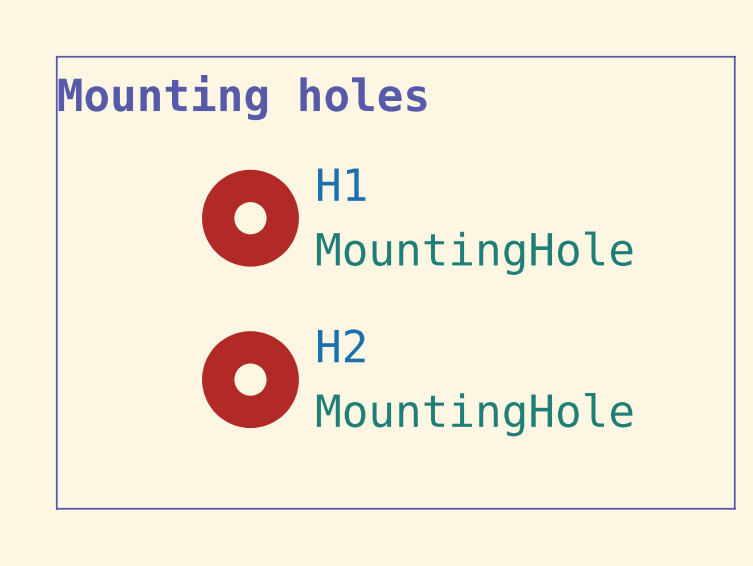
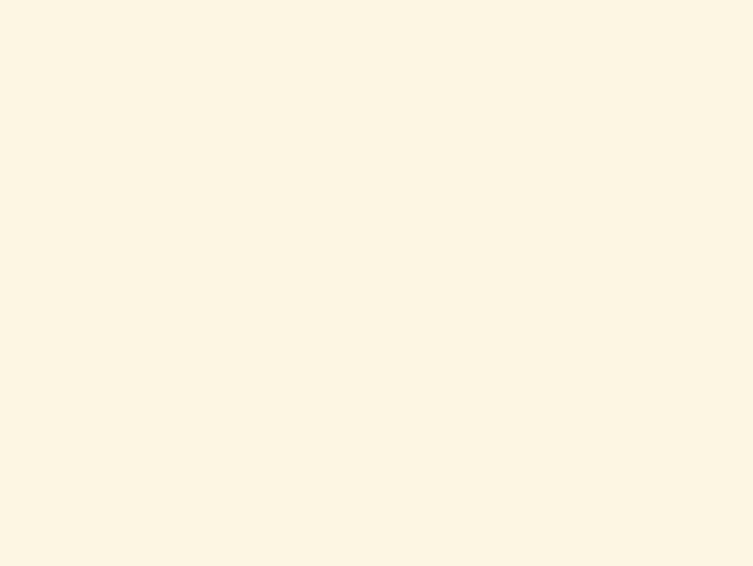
line: (56, 56) (734, 56) (734, 508) (56, 508) (56, 56) -> none
text: Mounting holes (242, 97) -> none
H1: MountingHole (250, 218) -> none
H2: MountingHole (250, 379) -> none

